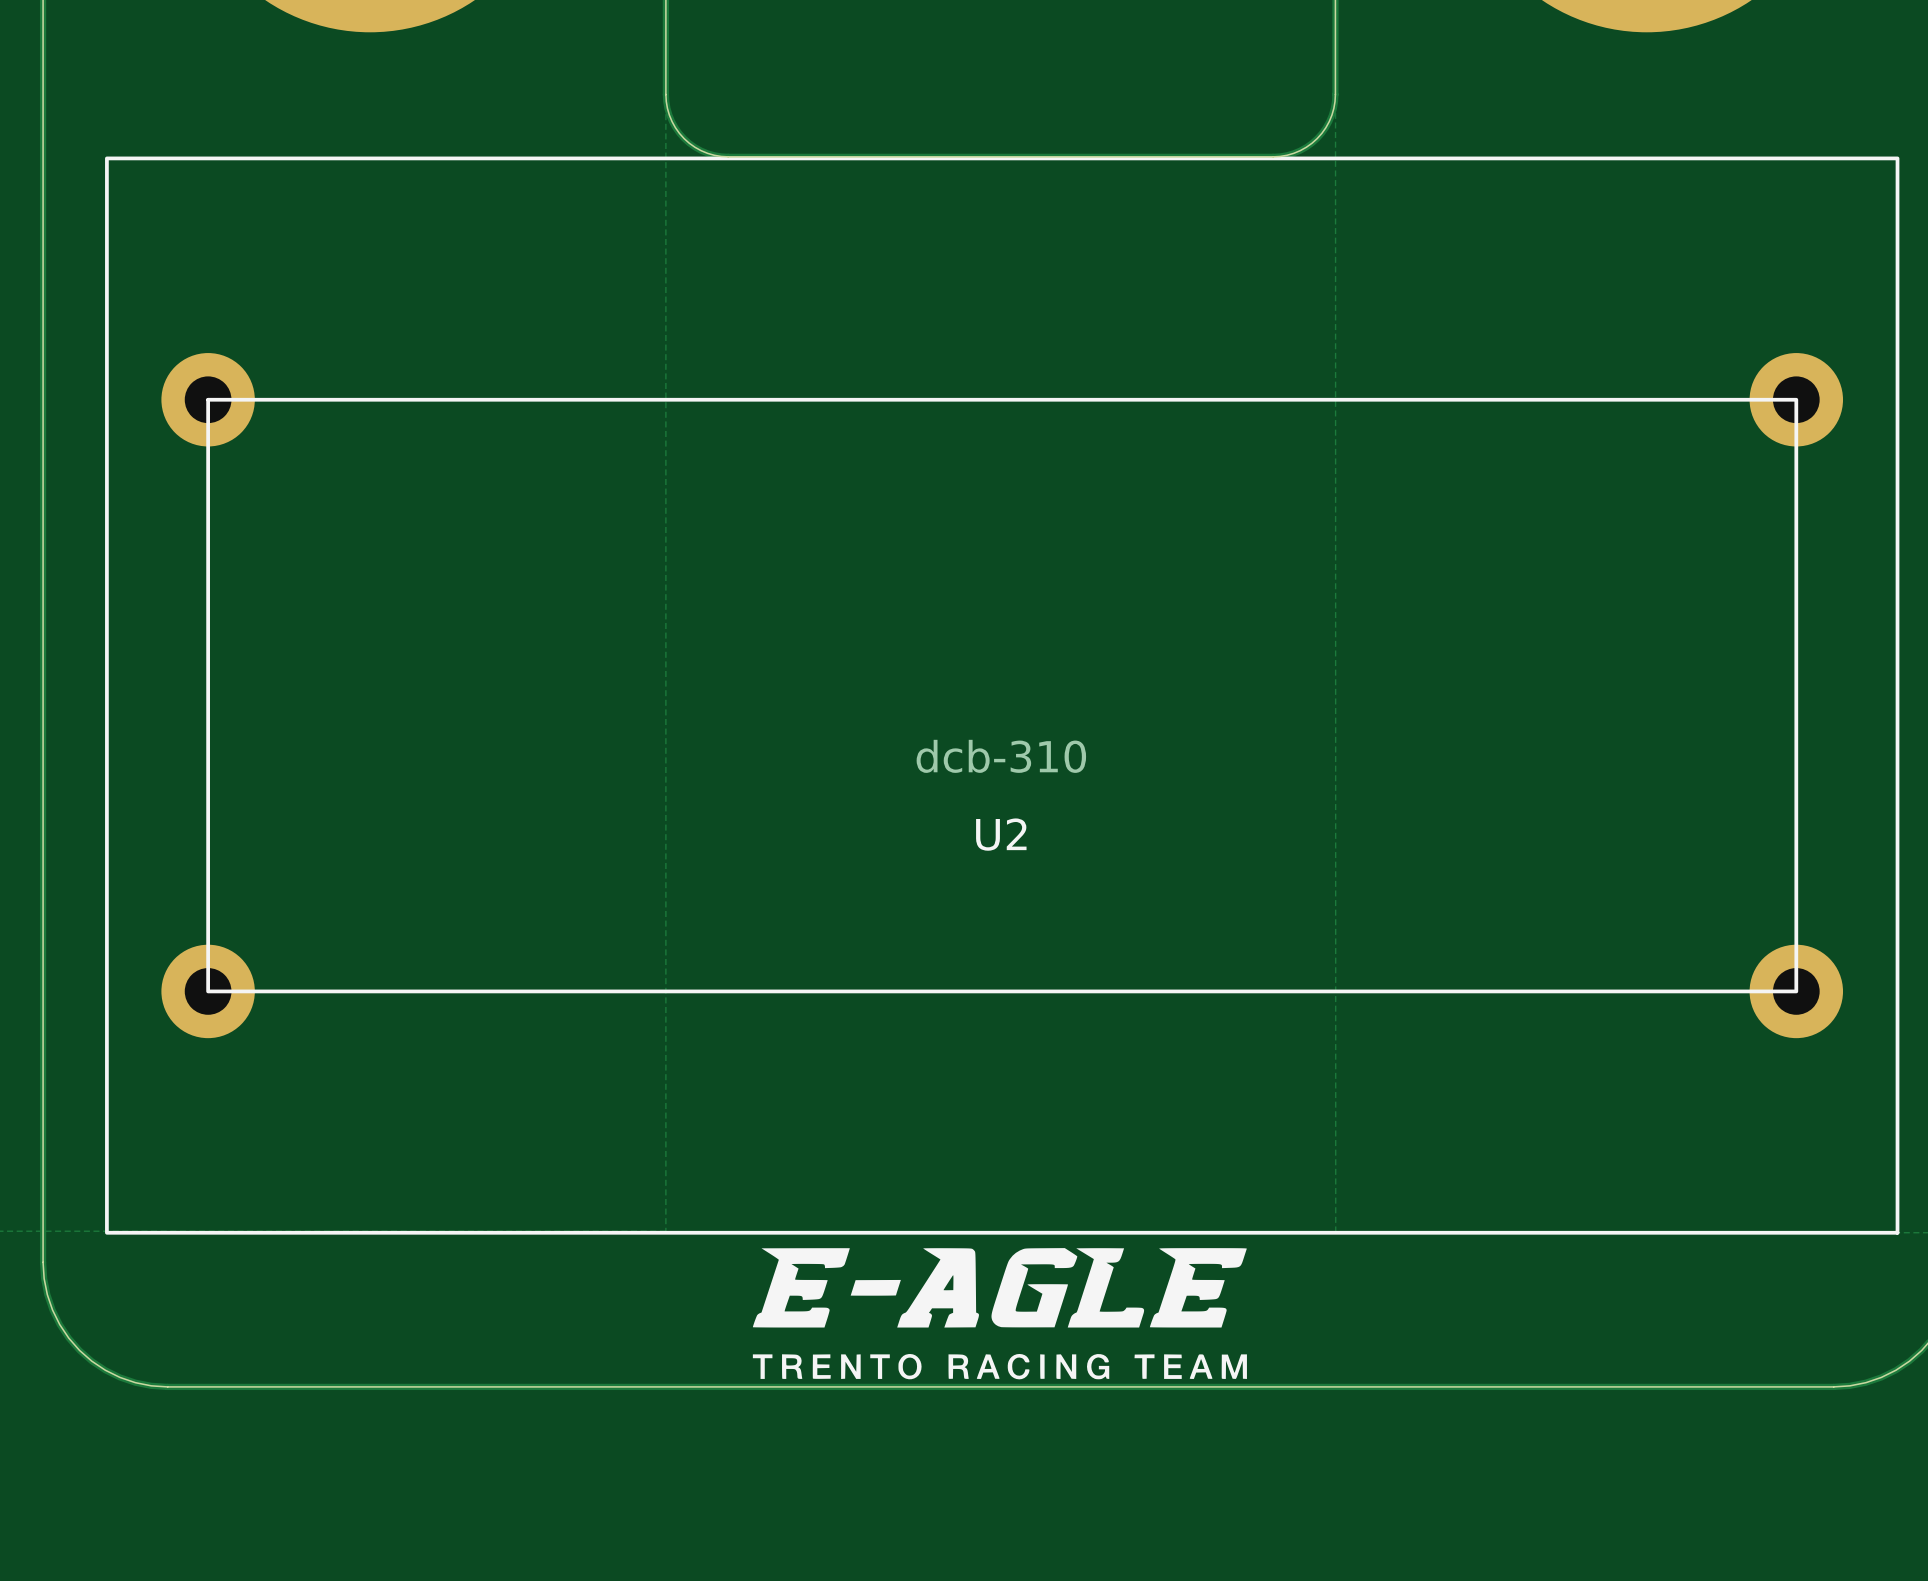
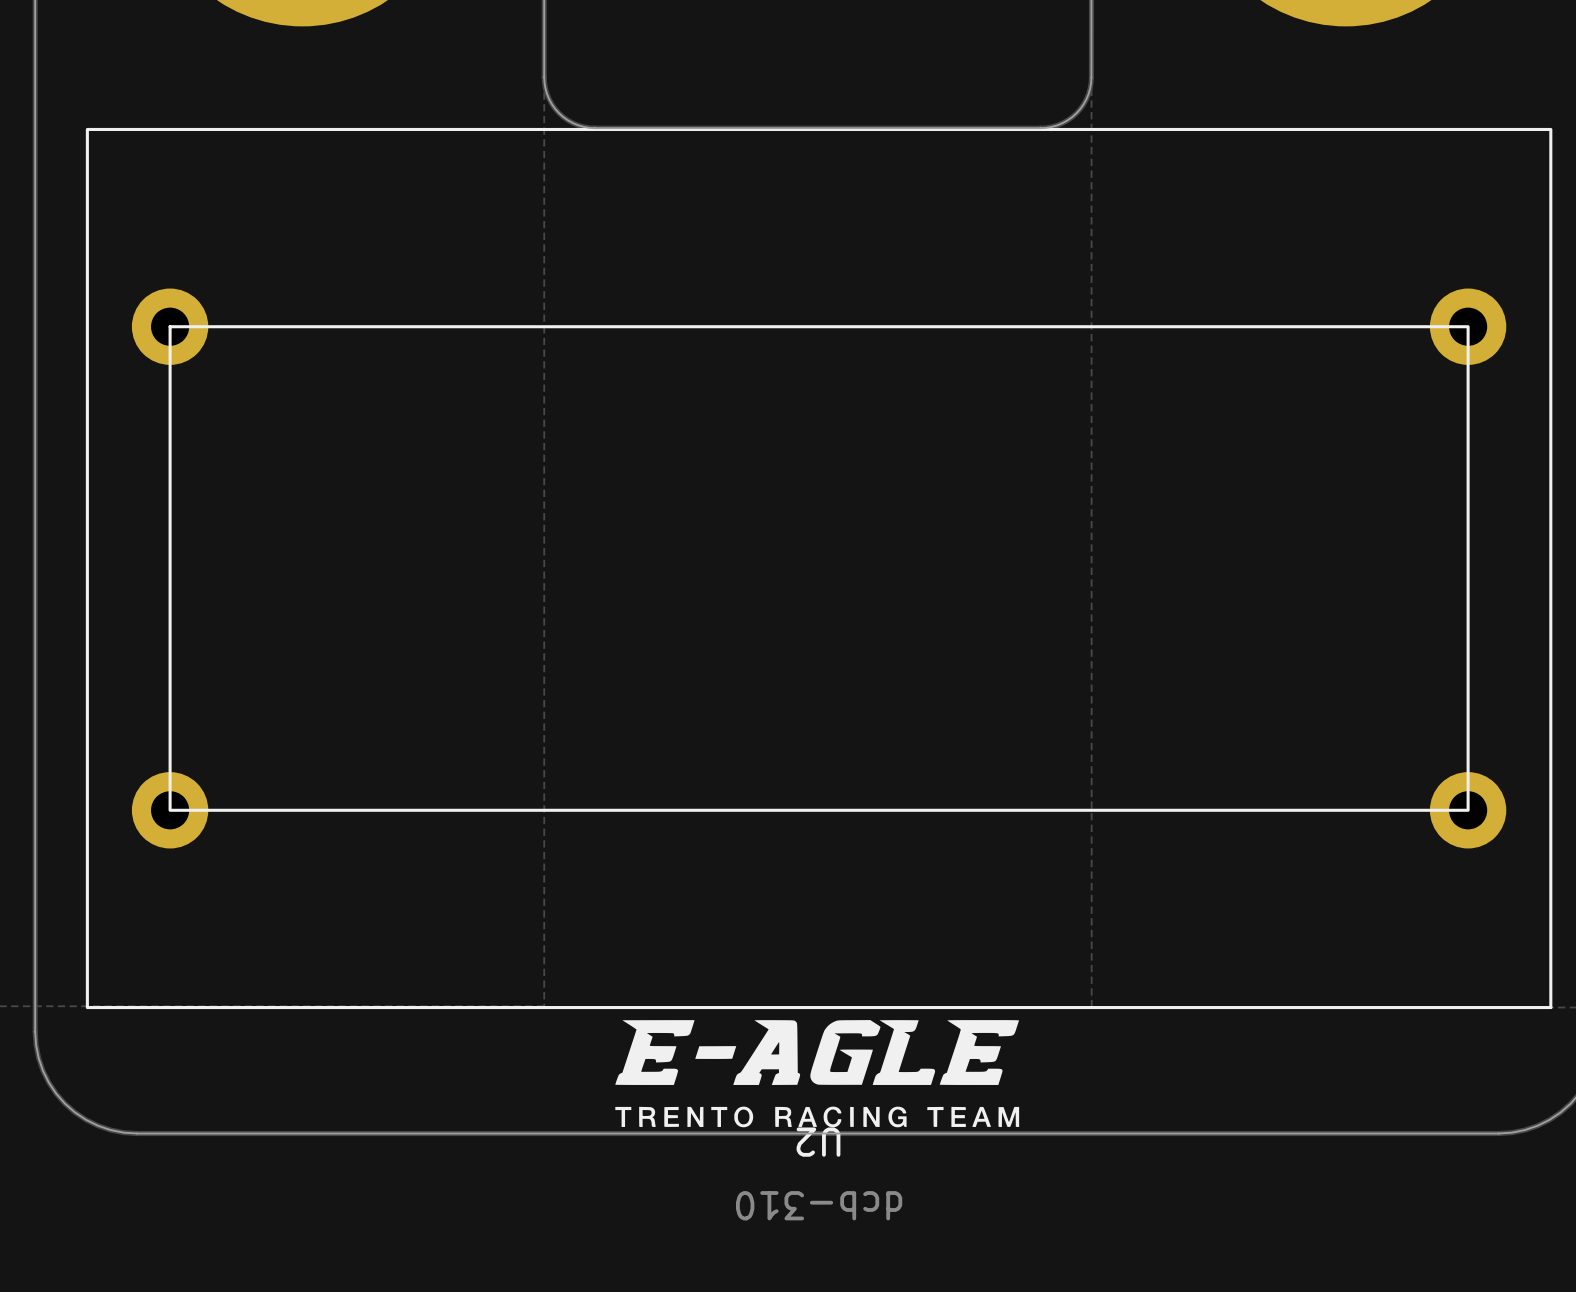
U2 value rotation: 0° (1001, 756) -> 180° (819, 1205)
U2 value position: dcb-310 (1001, 756) -> dcb-310 (819, 1205)
U2 name rotation: 0° (1001, 834) -> 180° (818, 1142)
U2 name position: U2 (1001, 834) -> U2 (818, 1142)

